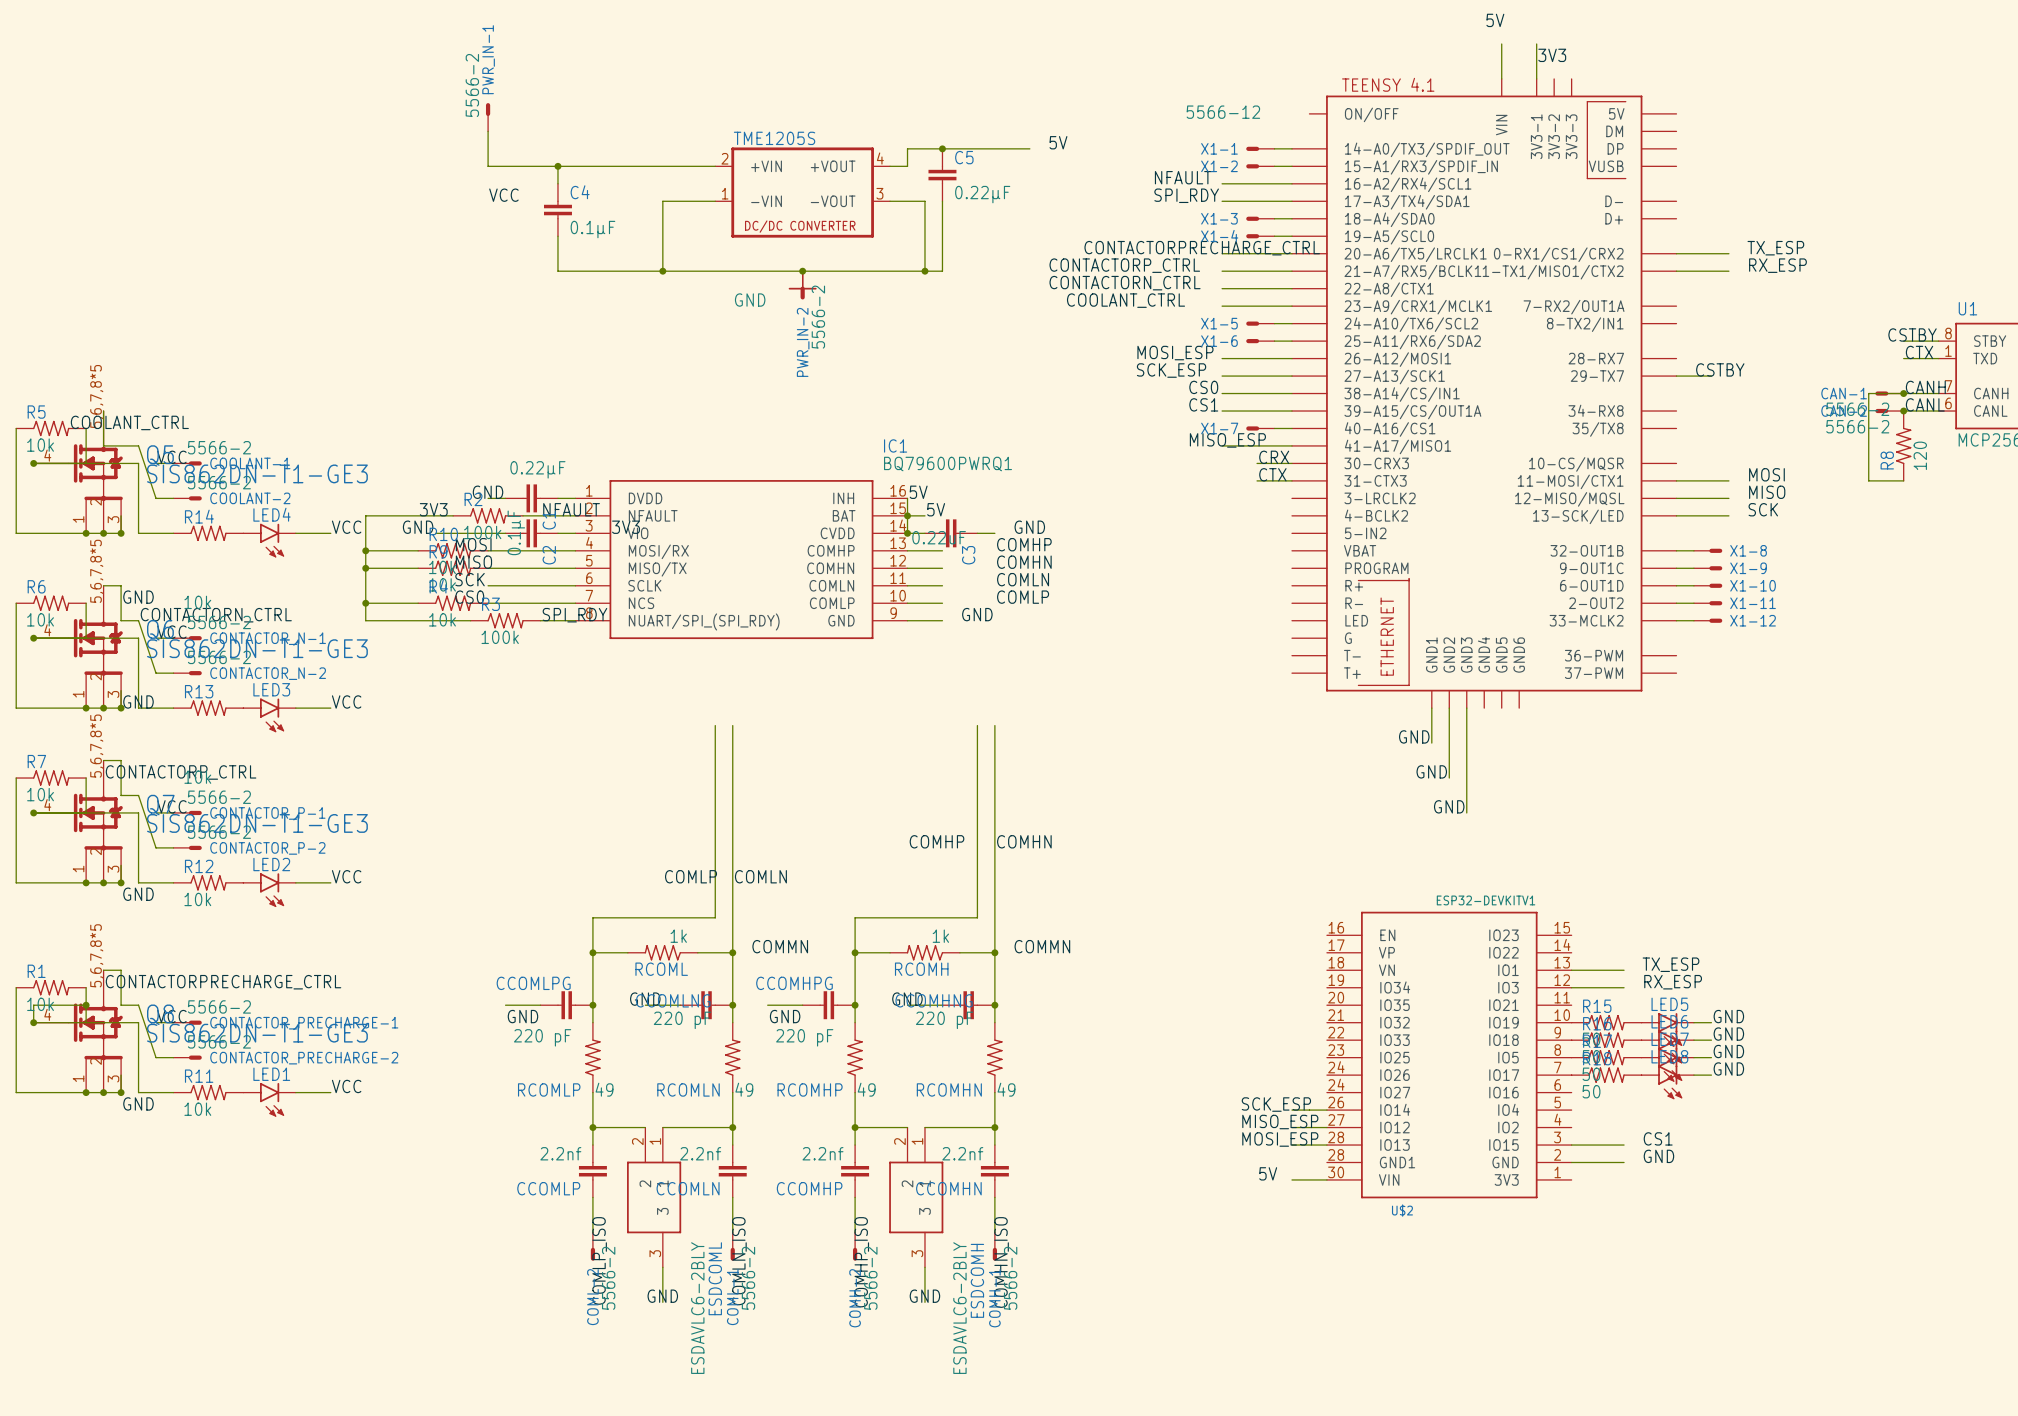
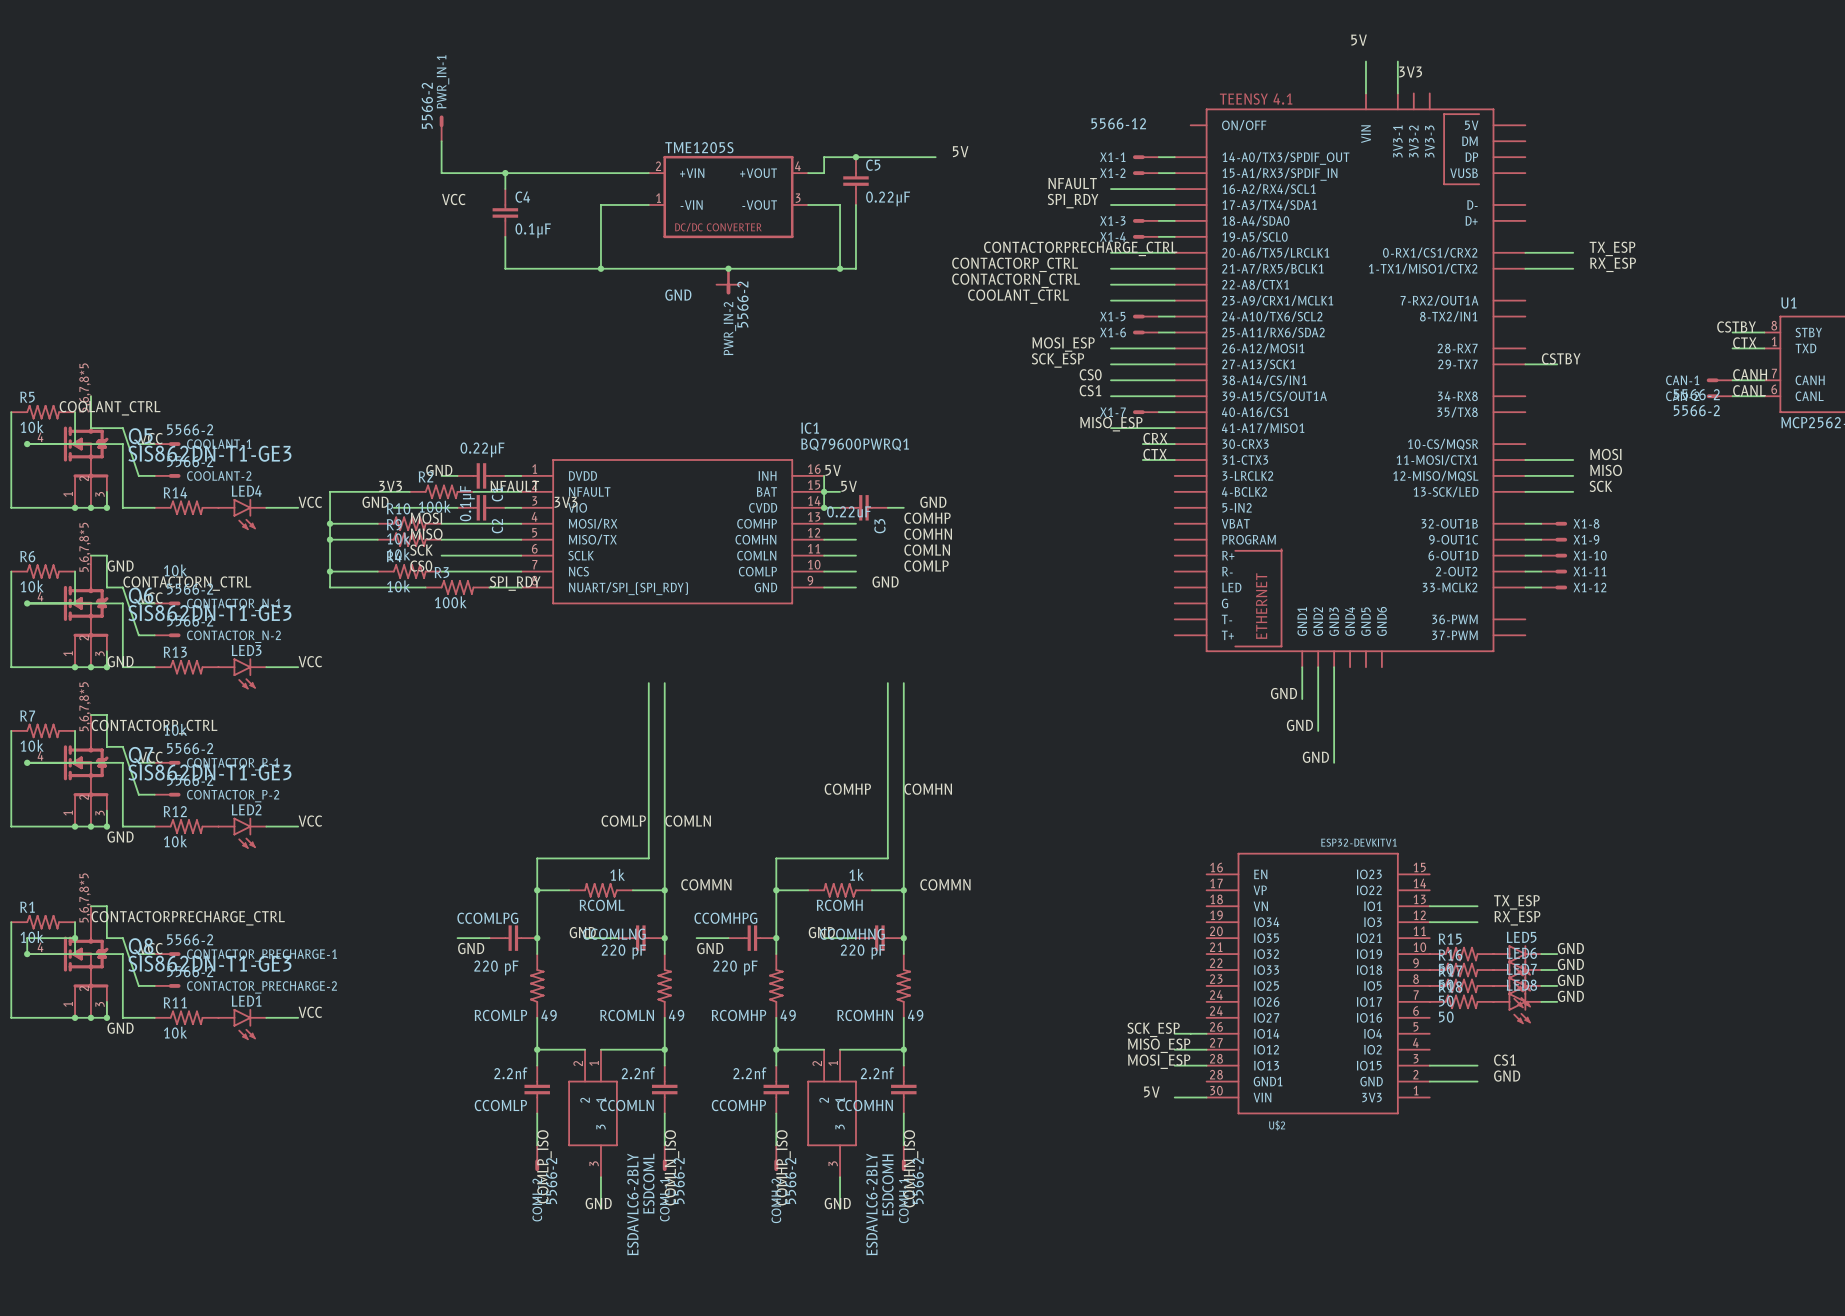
wire: (1903, 393) (1868, 393) (1868, 480) (1903, 480) -> none
junction: (1903, 393) -> none
junction: (1903, 411) -> none
R8: 120 (1903, 445) -> none

